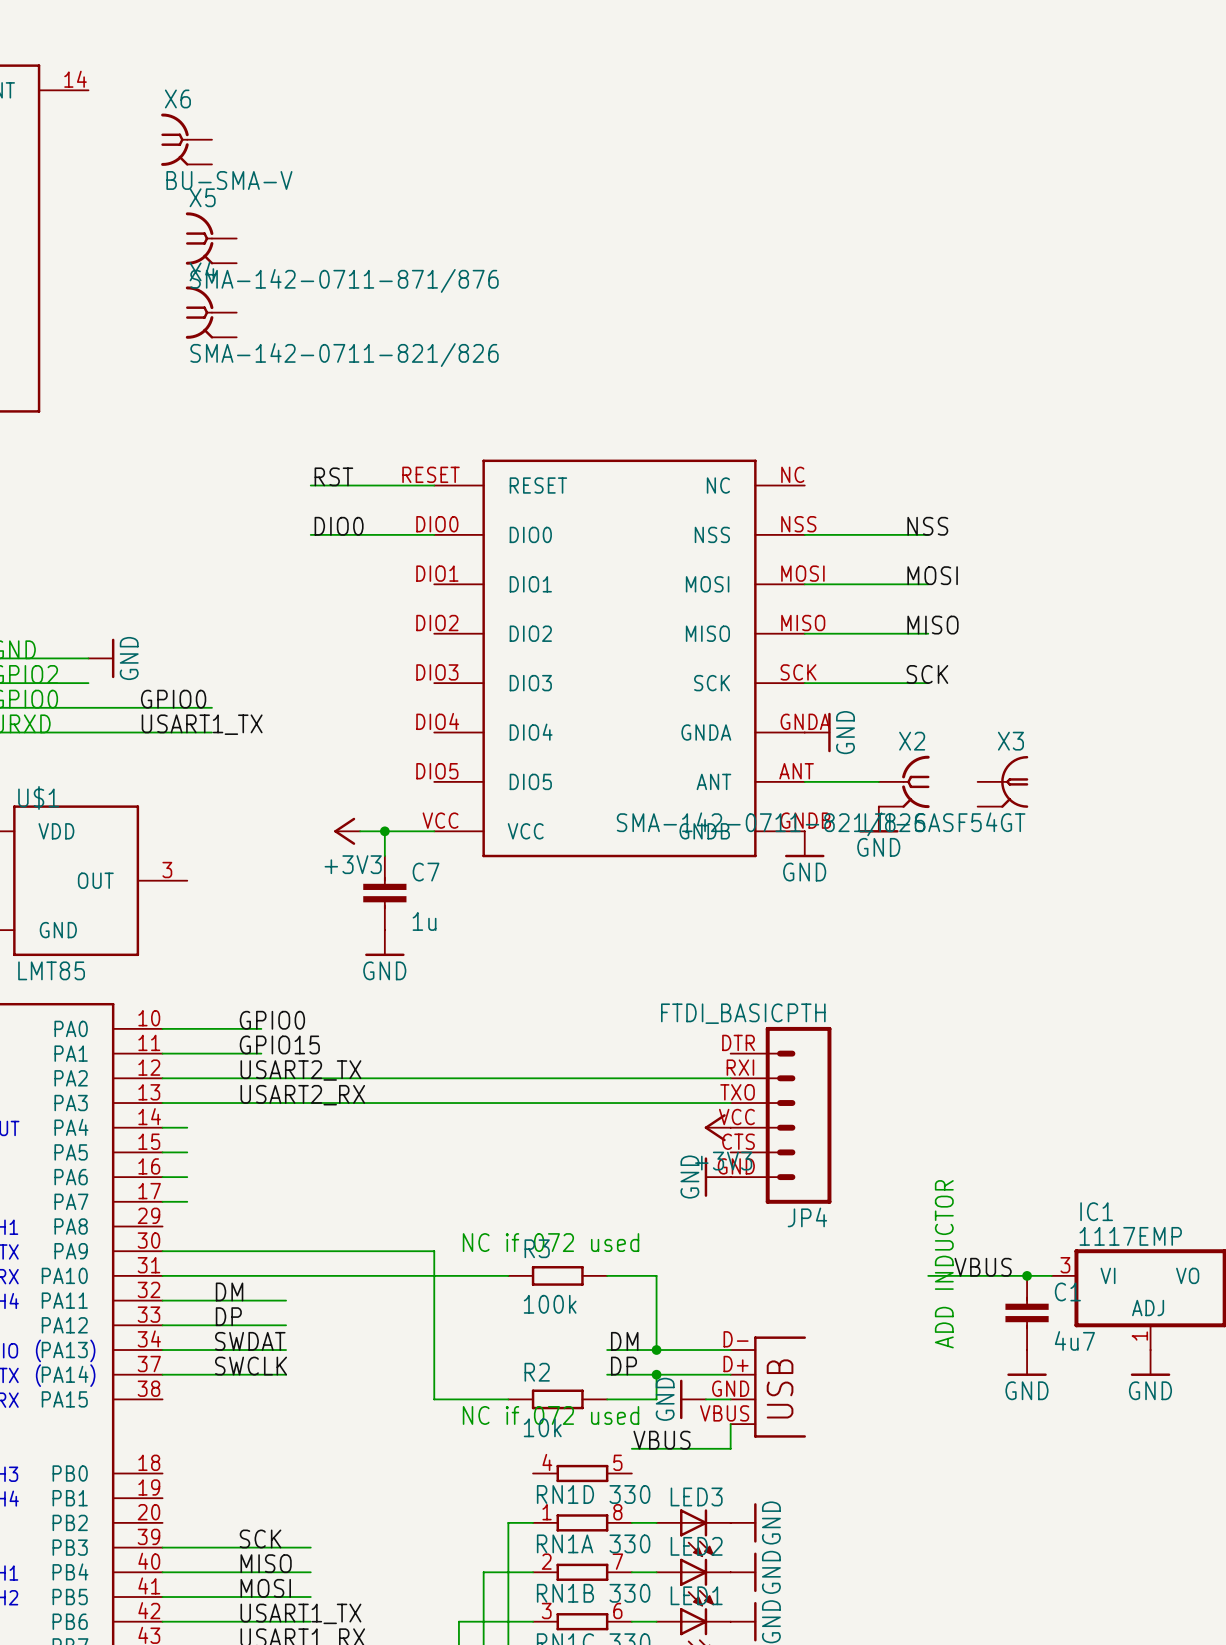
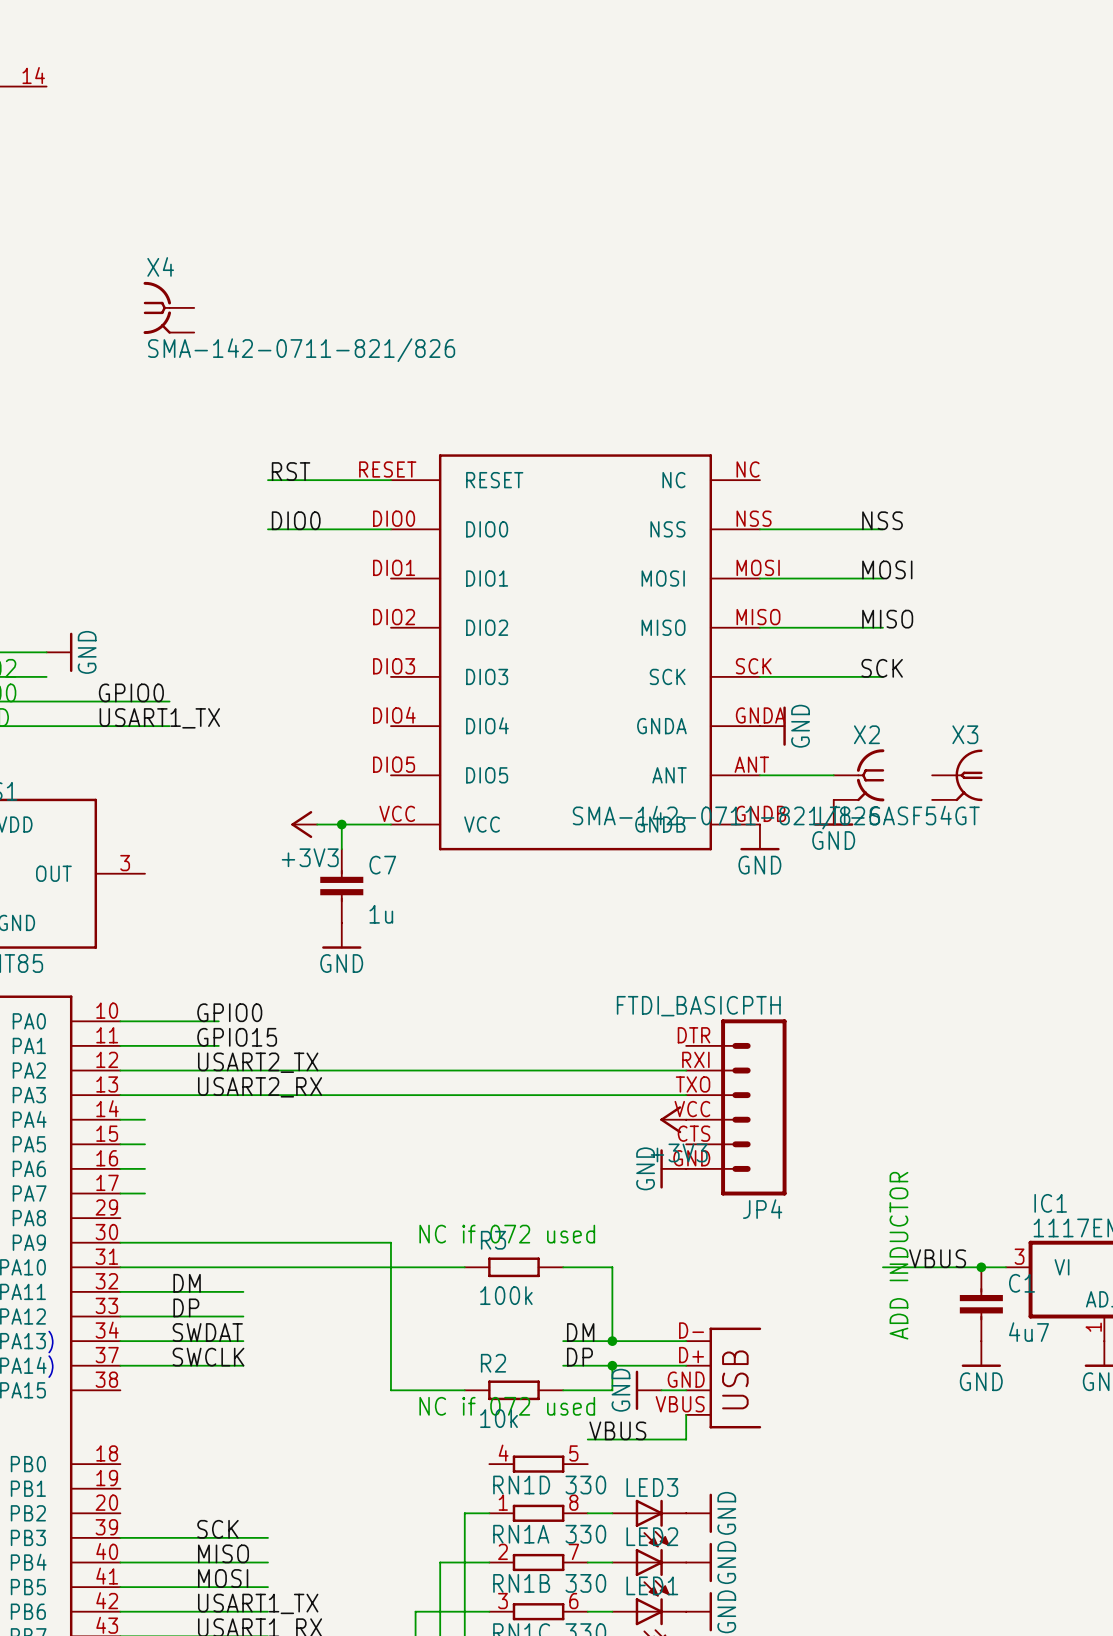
X6: BU-SMA-V (186, 139) -> none
X5: SMA-142-0711-871/876 (211, 238) -> none

